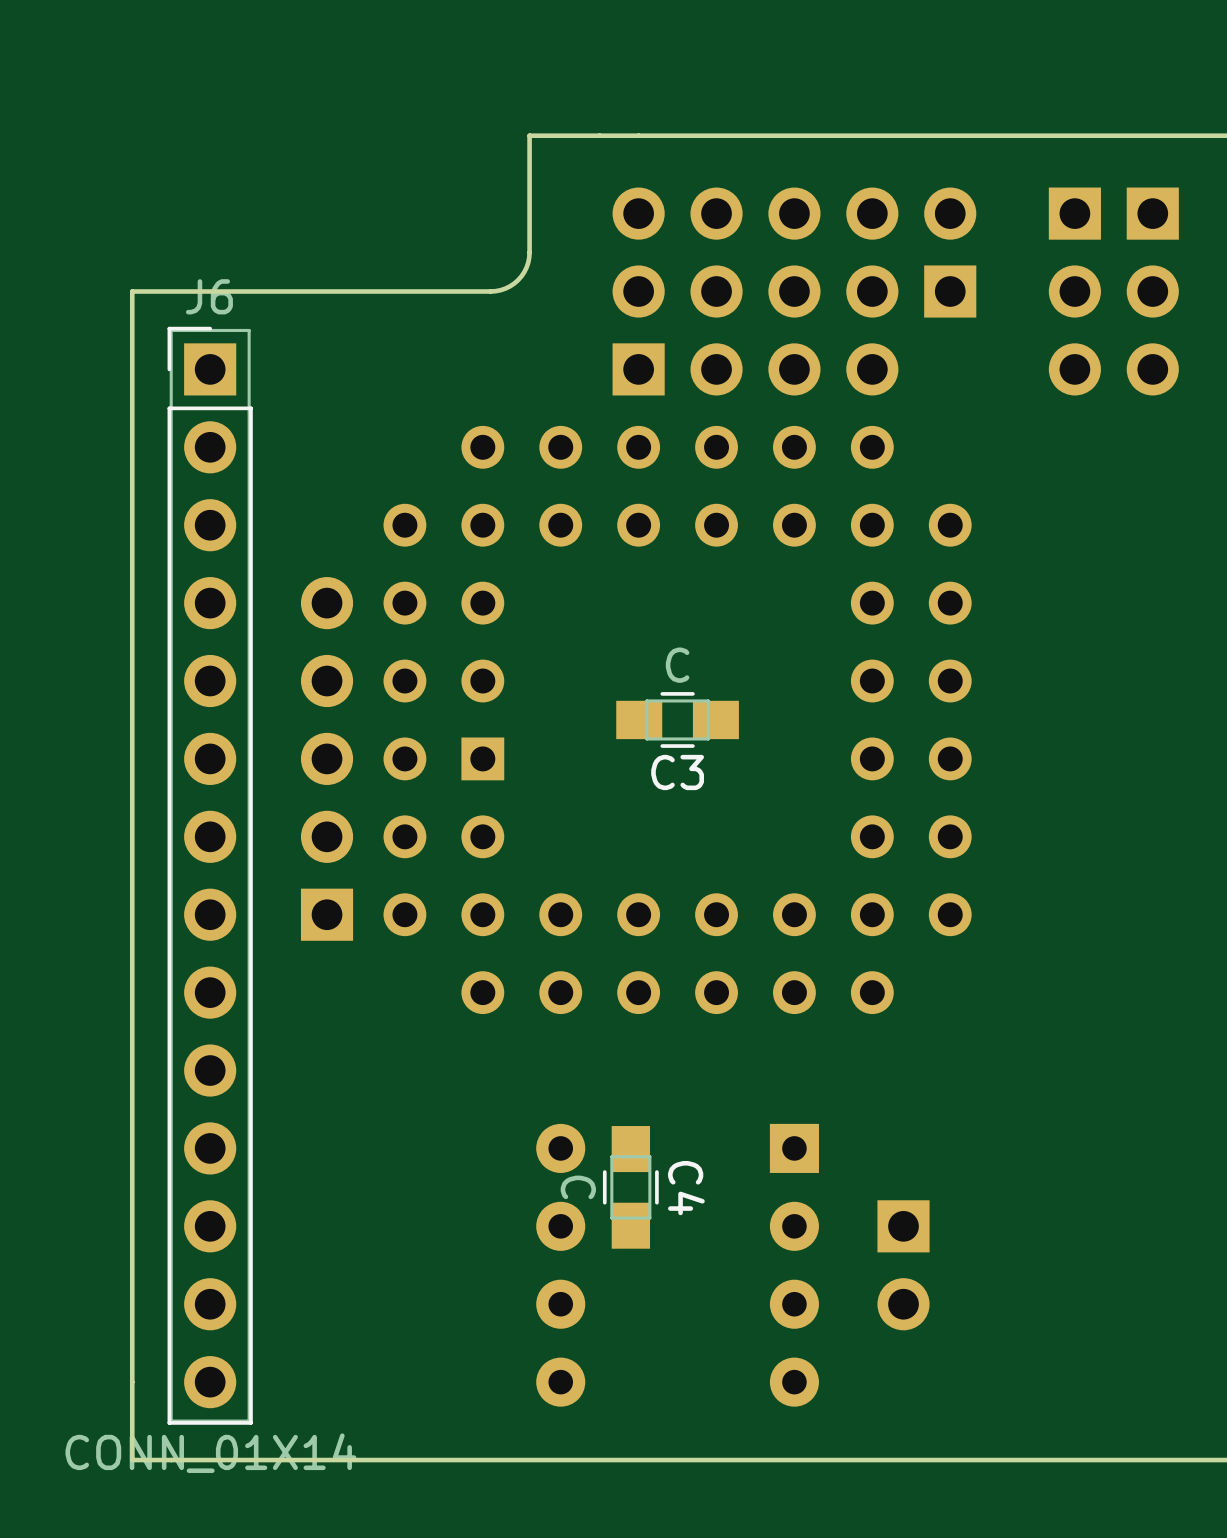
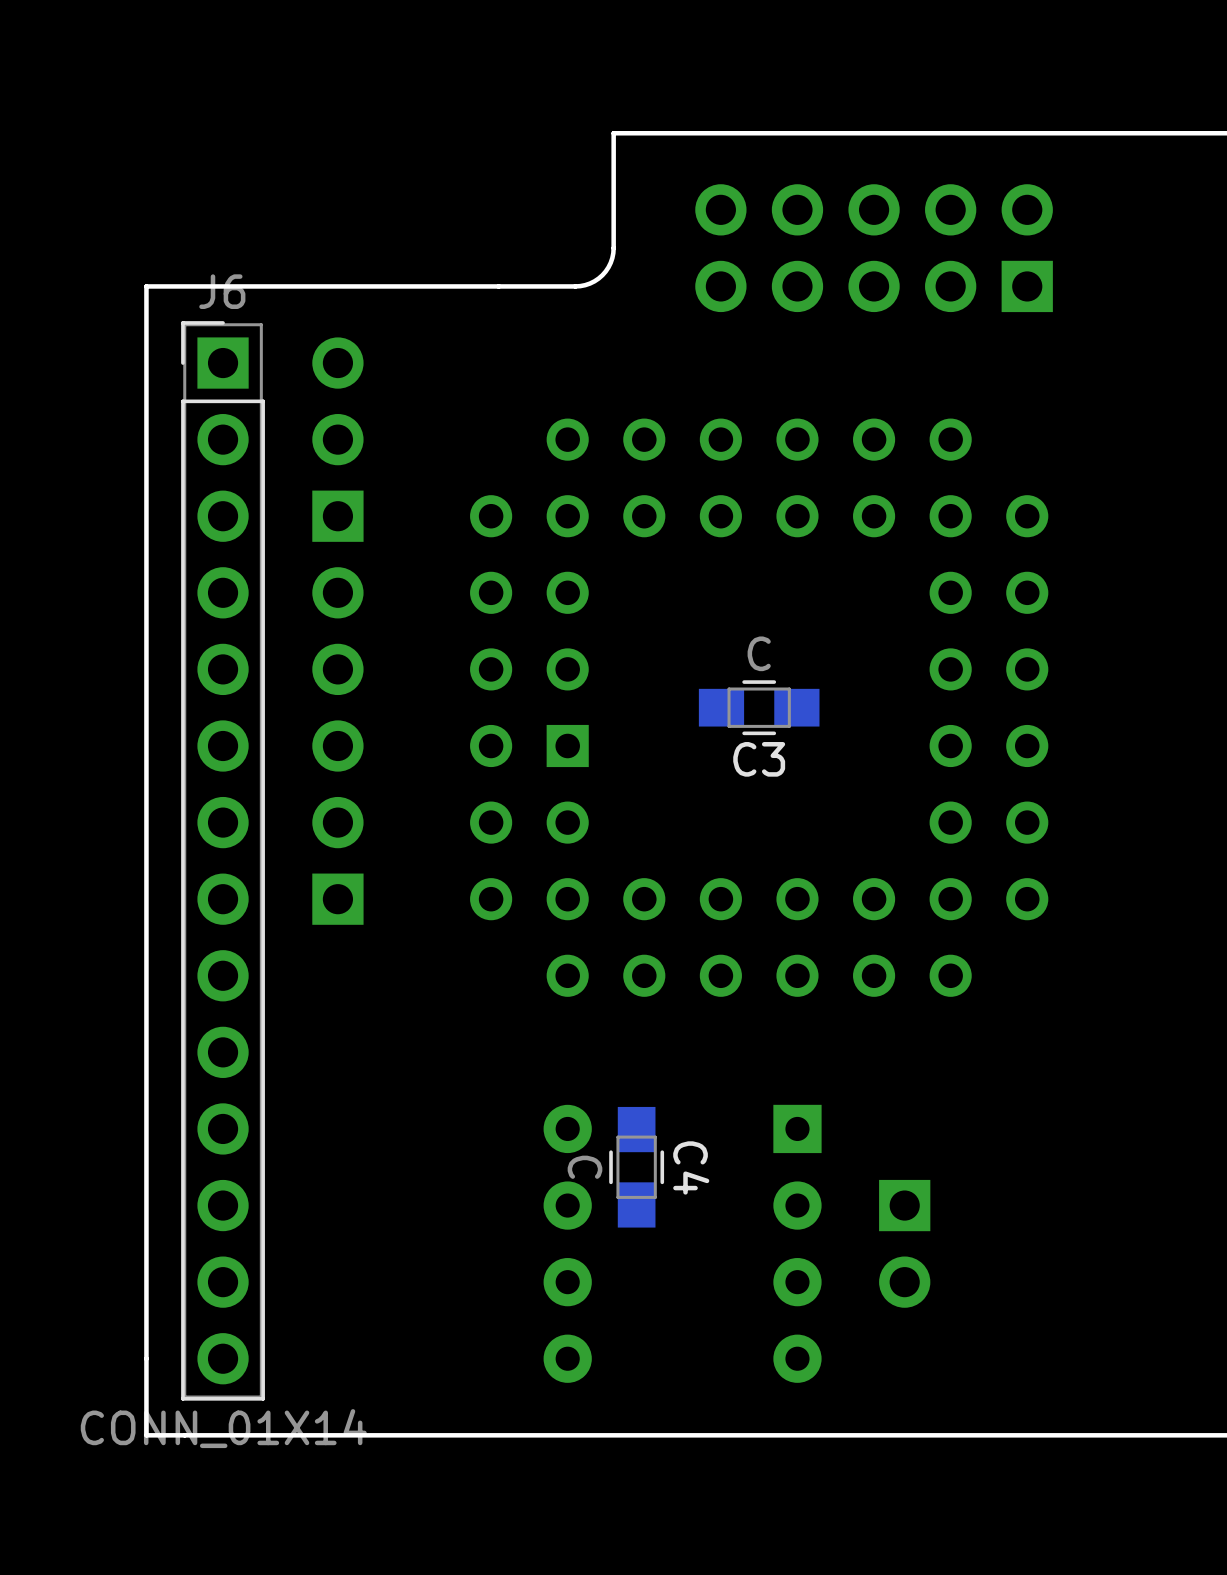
board edge: (607, 135) (529, 135) (528, 262) (521, 276) (514, 283) (505, 288) (490, 291) -> (613, 133) (613, 248) (612, 258) (605, 271) (594, 281) (580, 286) (498, 286)
part position: (794, 252) -> (874, 248)
part: (1074, 291) -> none
part: (1152, 291) -> none
part: (755, 369) -> none
part: none -> (337, 439)
C3 position: (677, 719) -> (759, 707)
part position: (677, 719) -> (759, 707)

